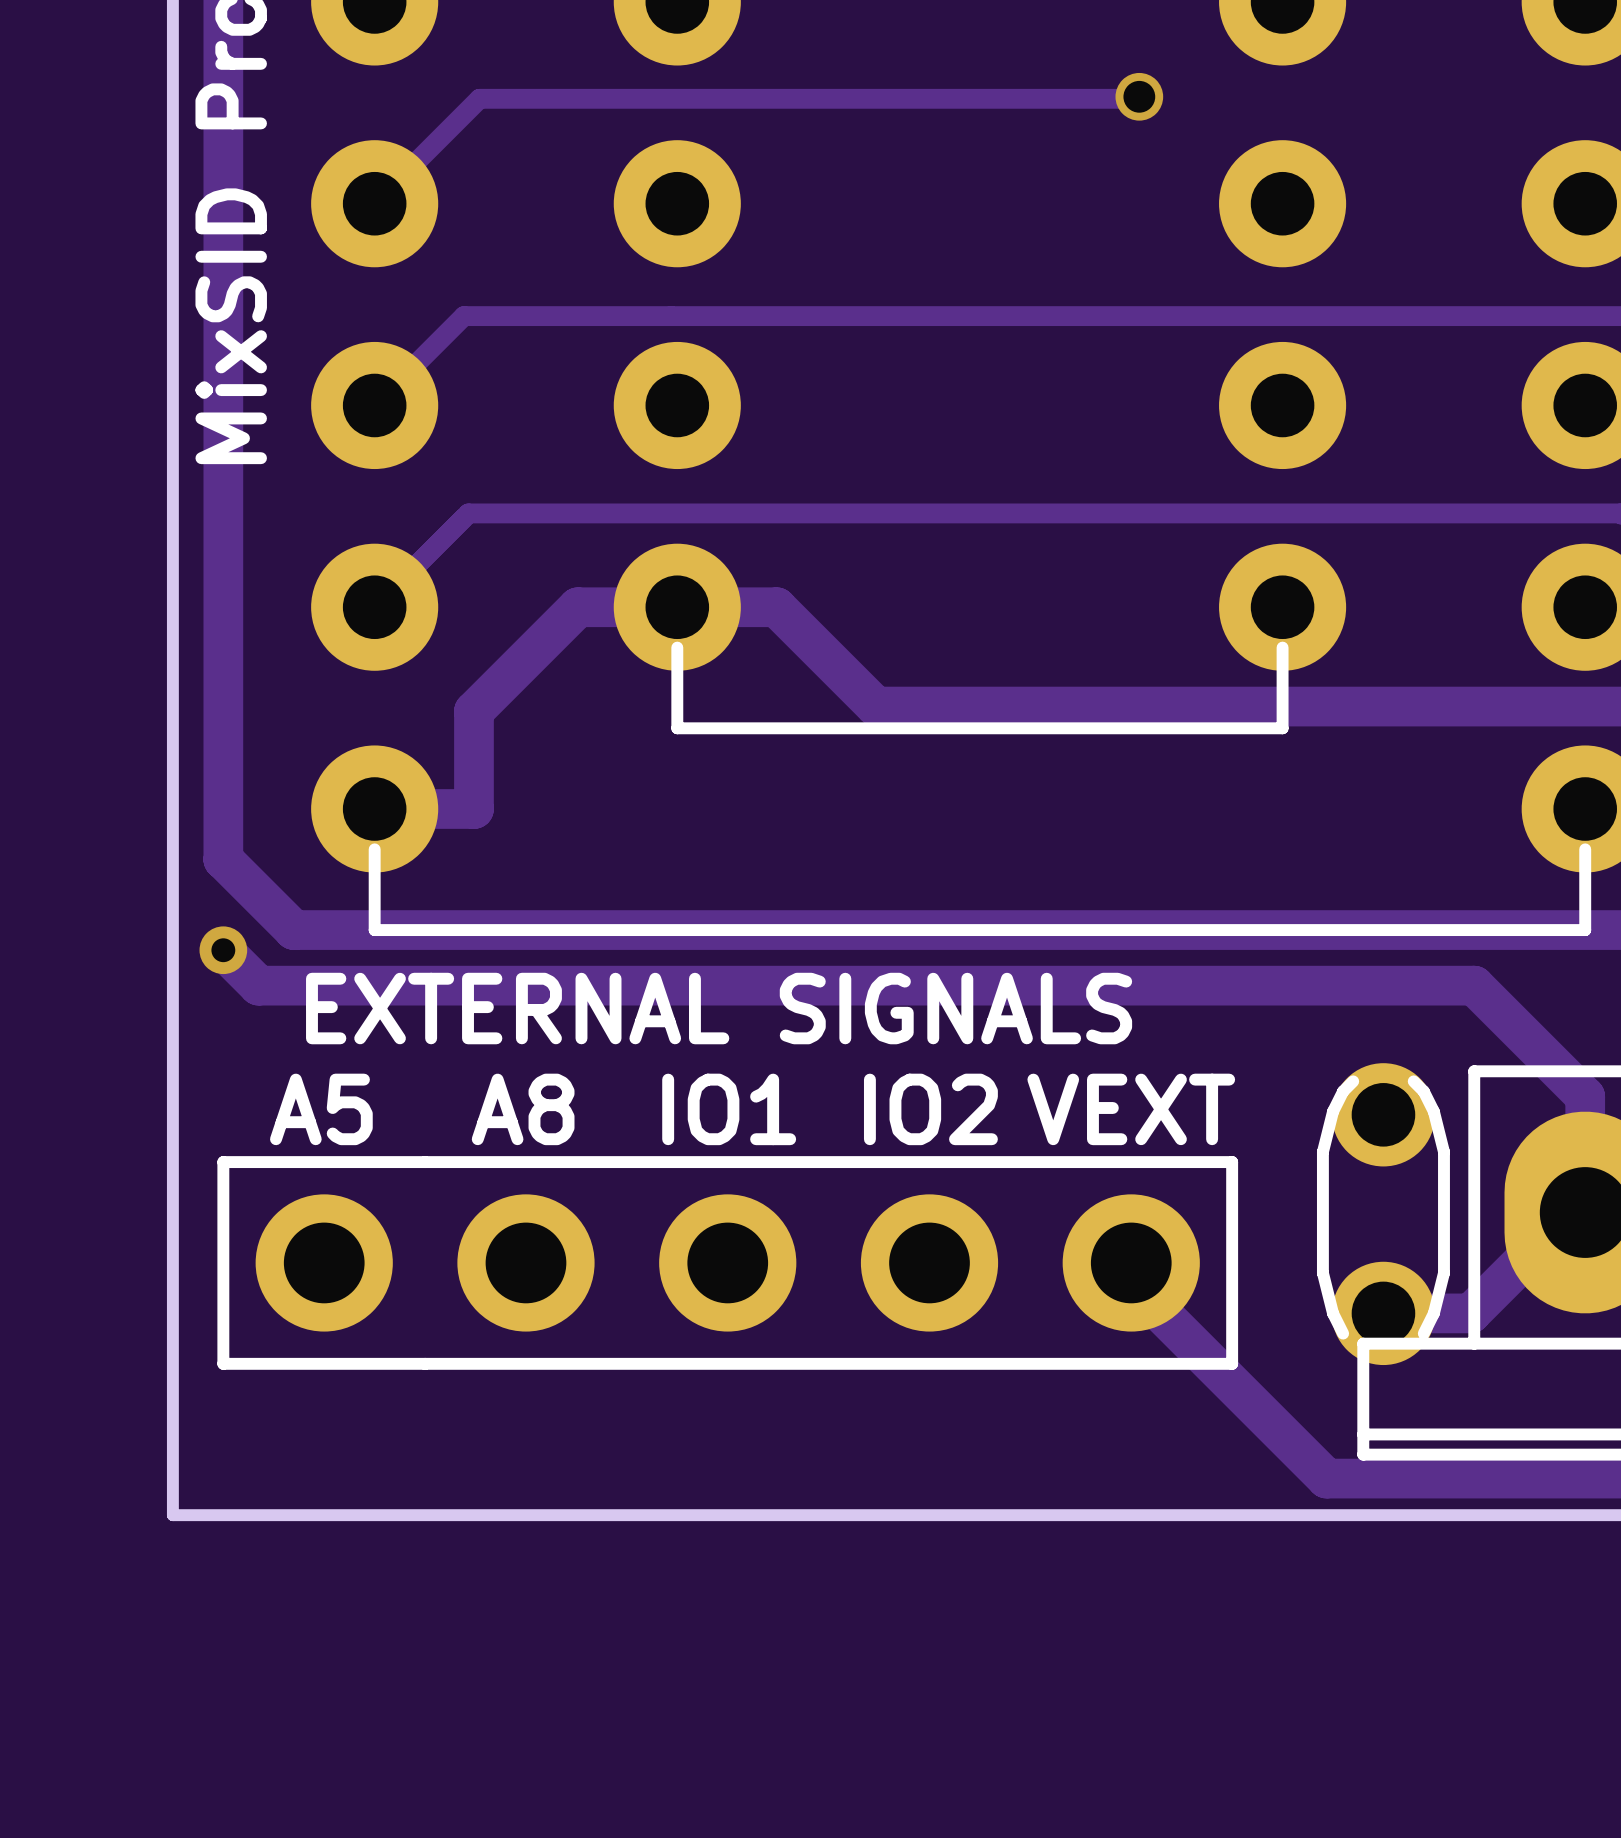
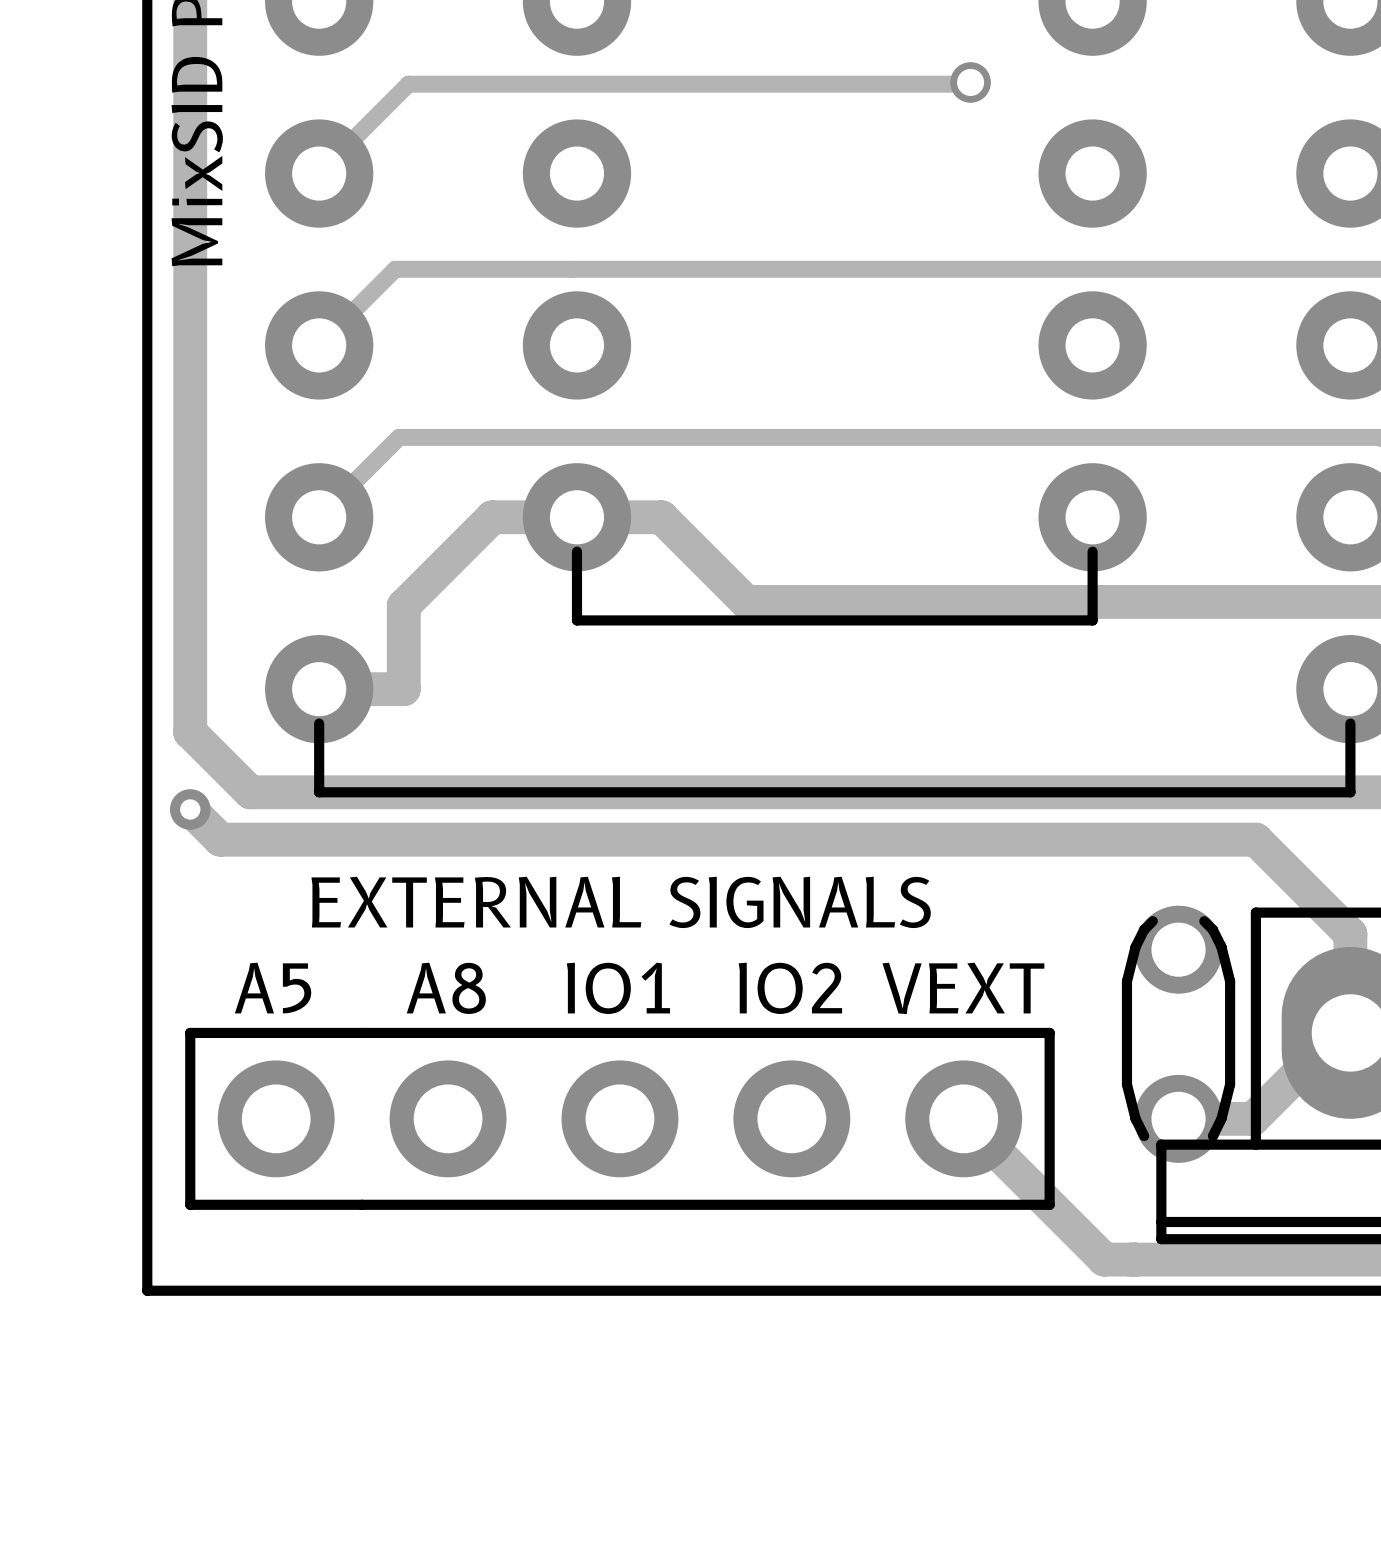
text position: EXTERNAL SIGNALS (719, 1008) -> EXTERNAL SIGNALS (621, 902)
text position: A5 (321, 1109) -> A5 (273, 988)
text position: A8 (523, 1109) -> A8 (446, 988)
text position: IO1 (729, 1109) -> IO1 (618, 988)
text position: IO2 (930, 1109) -> IO2 (790, 988)
text position: VEXT (1131, 1109) -> VEXT (963, 988)
part position: (727, 1262) -> (619, 1118)
track: (1121, 1273) (1326, 1478) -> (963, 1118) (1104, 1259) (1130, 1259)

